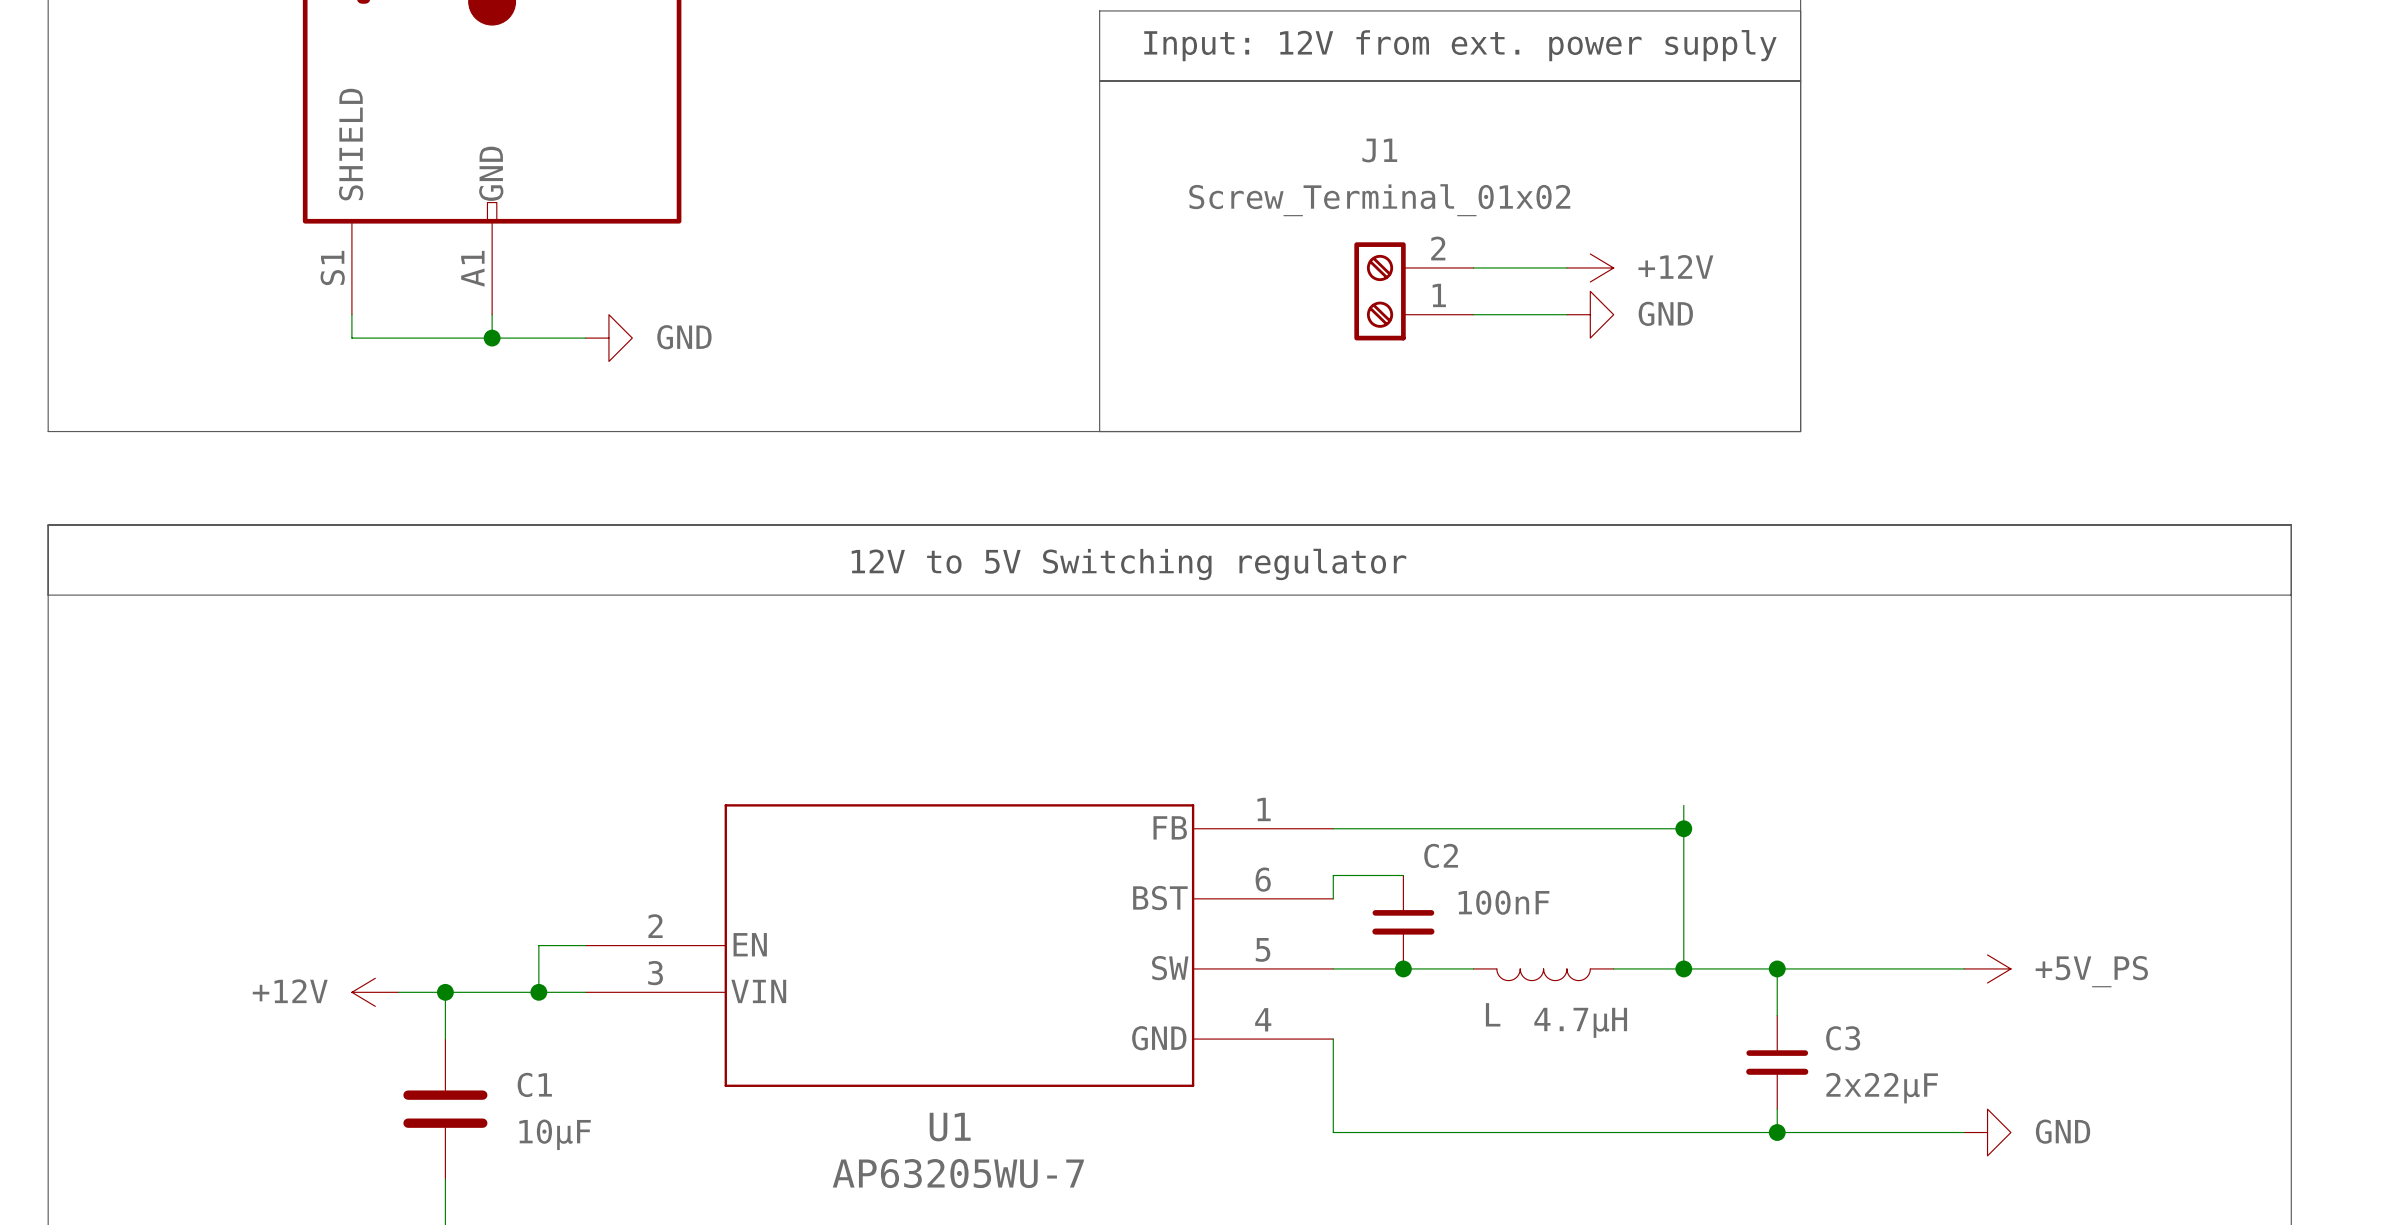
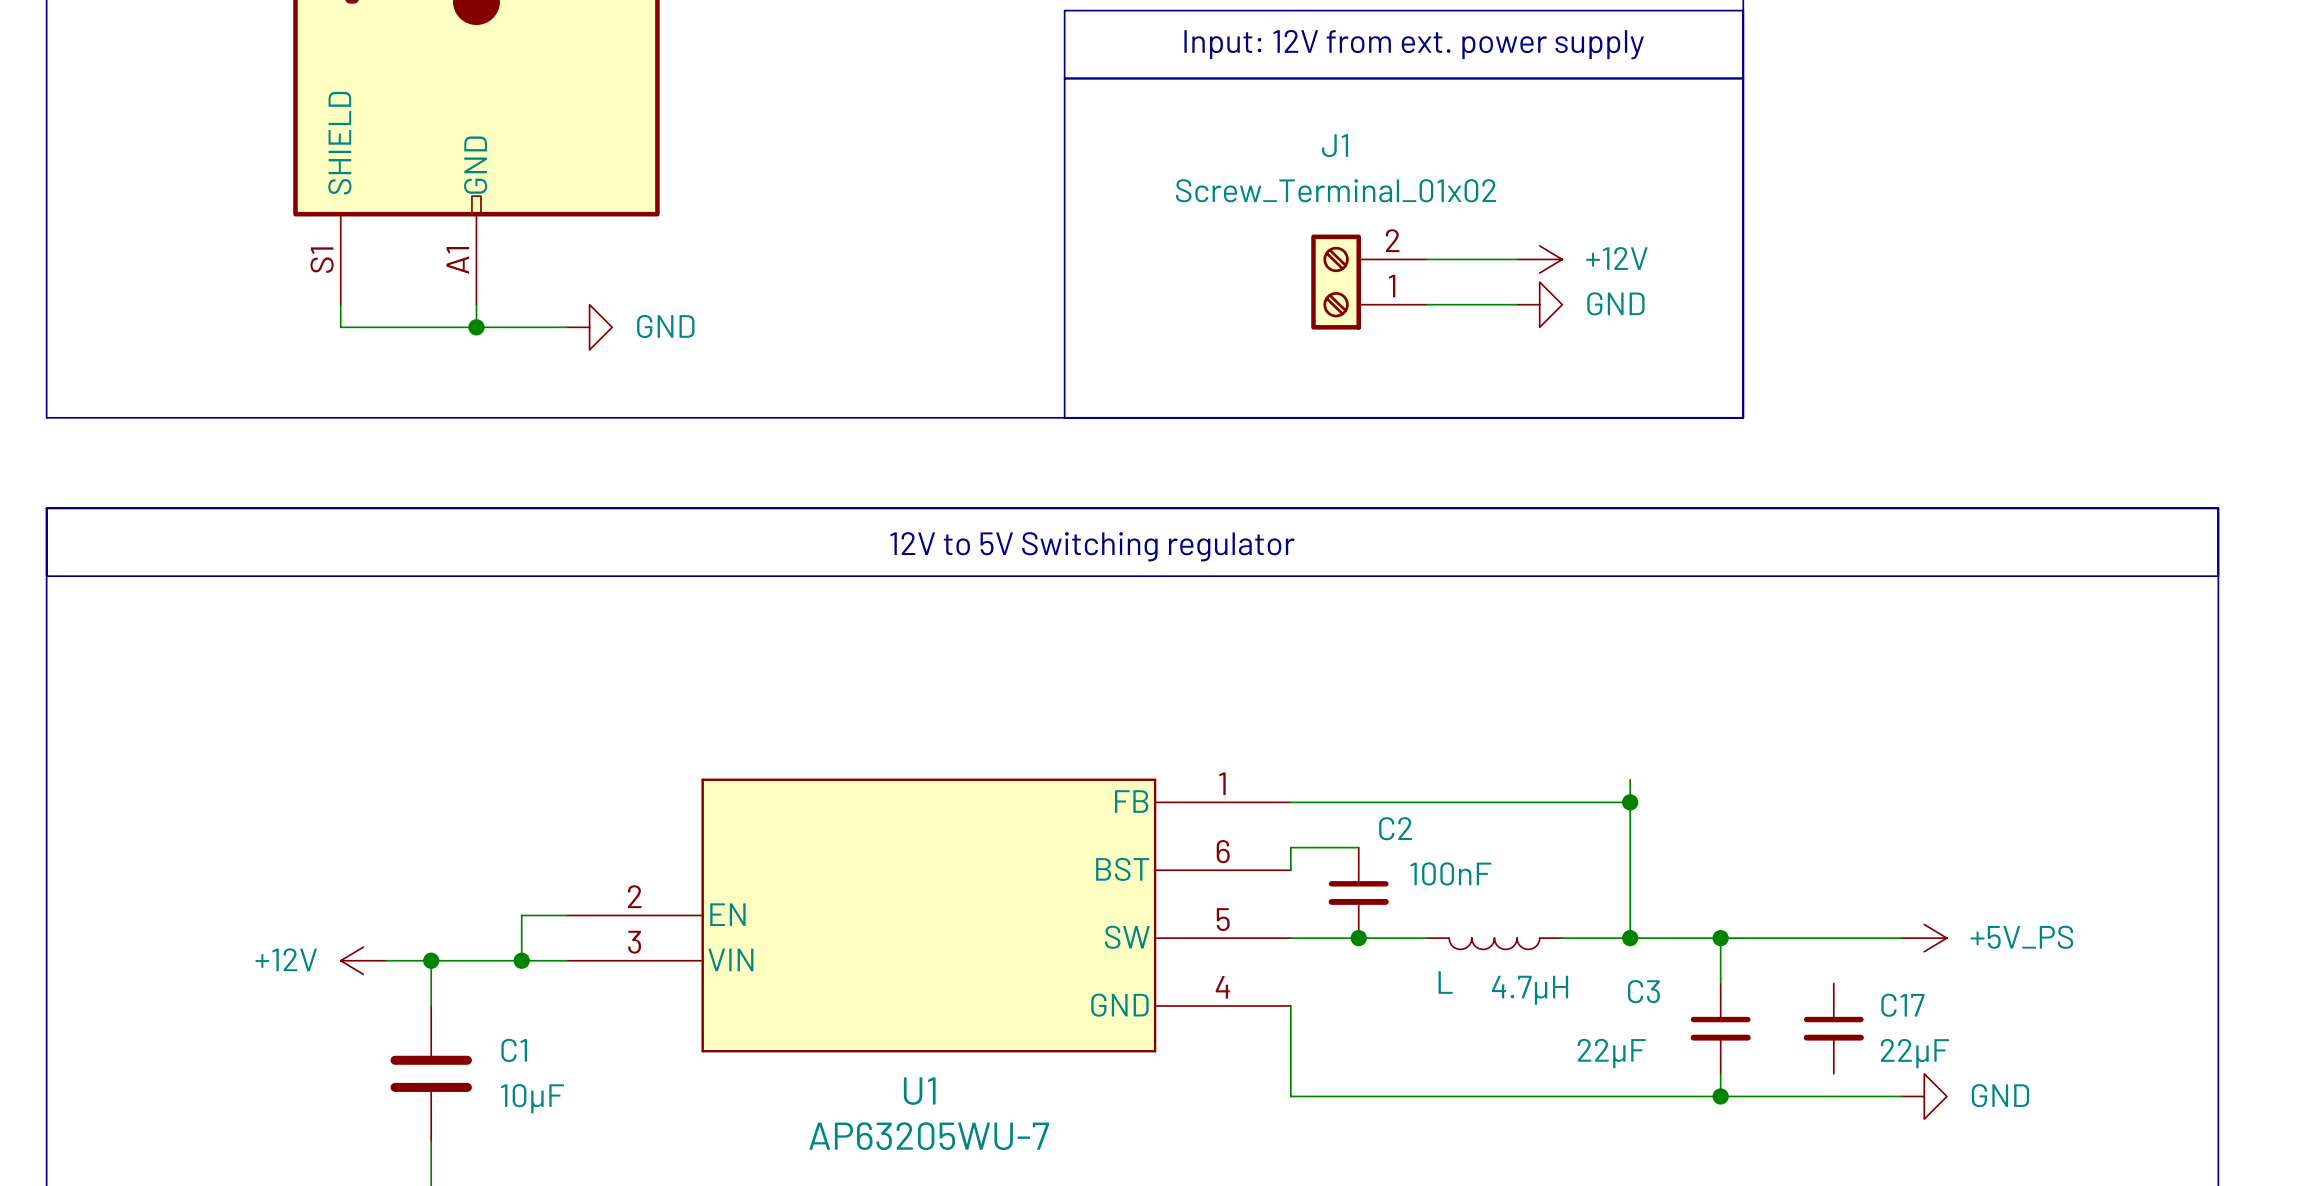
C3 name position: C3 (1843, 1038) -> C3 (1643, 991)
C17: none -> 22μF (1833, 1028)
C3 value: 2x22μF (1882, 1088) -> 22μF (1611, 1053)

